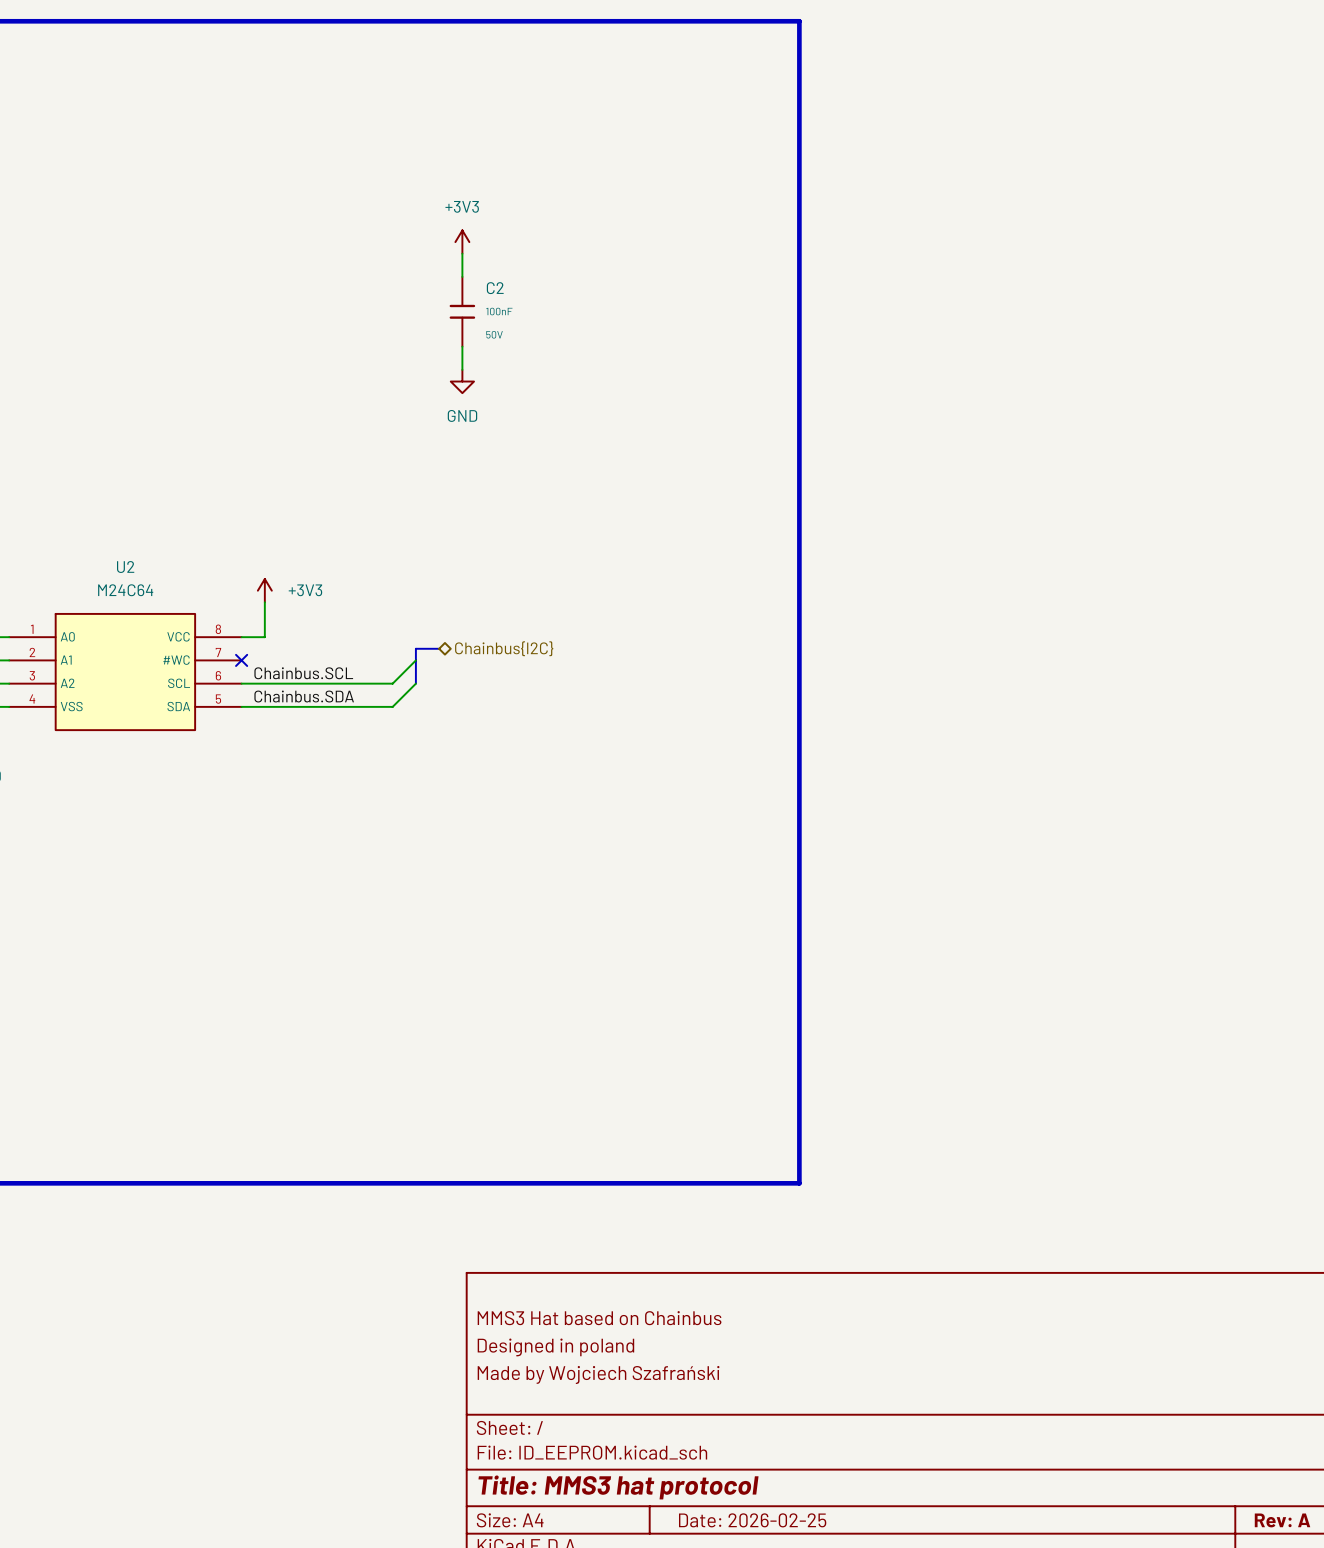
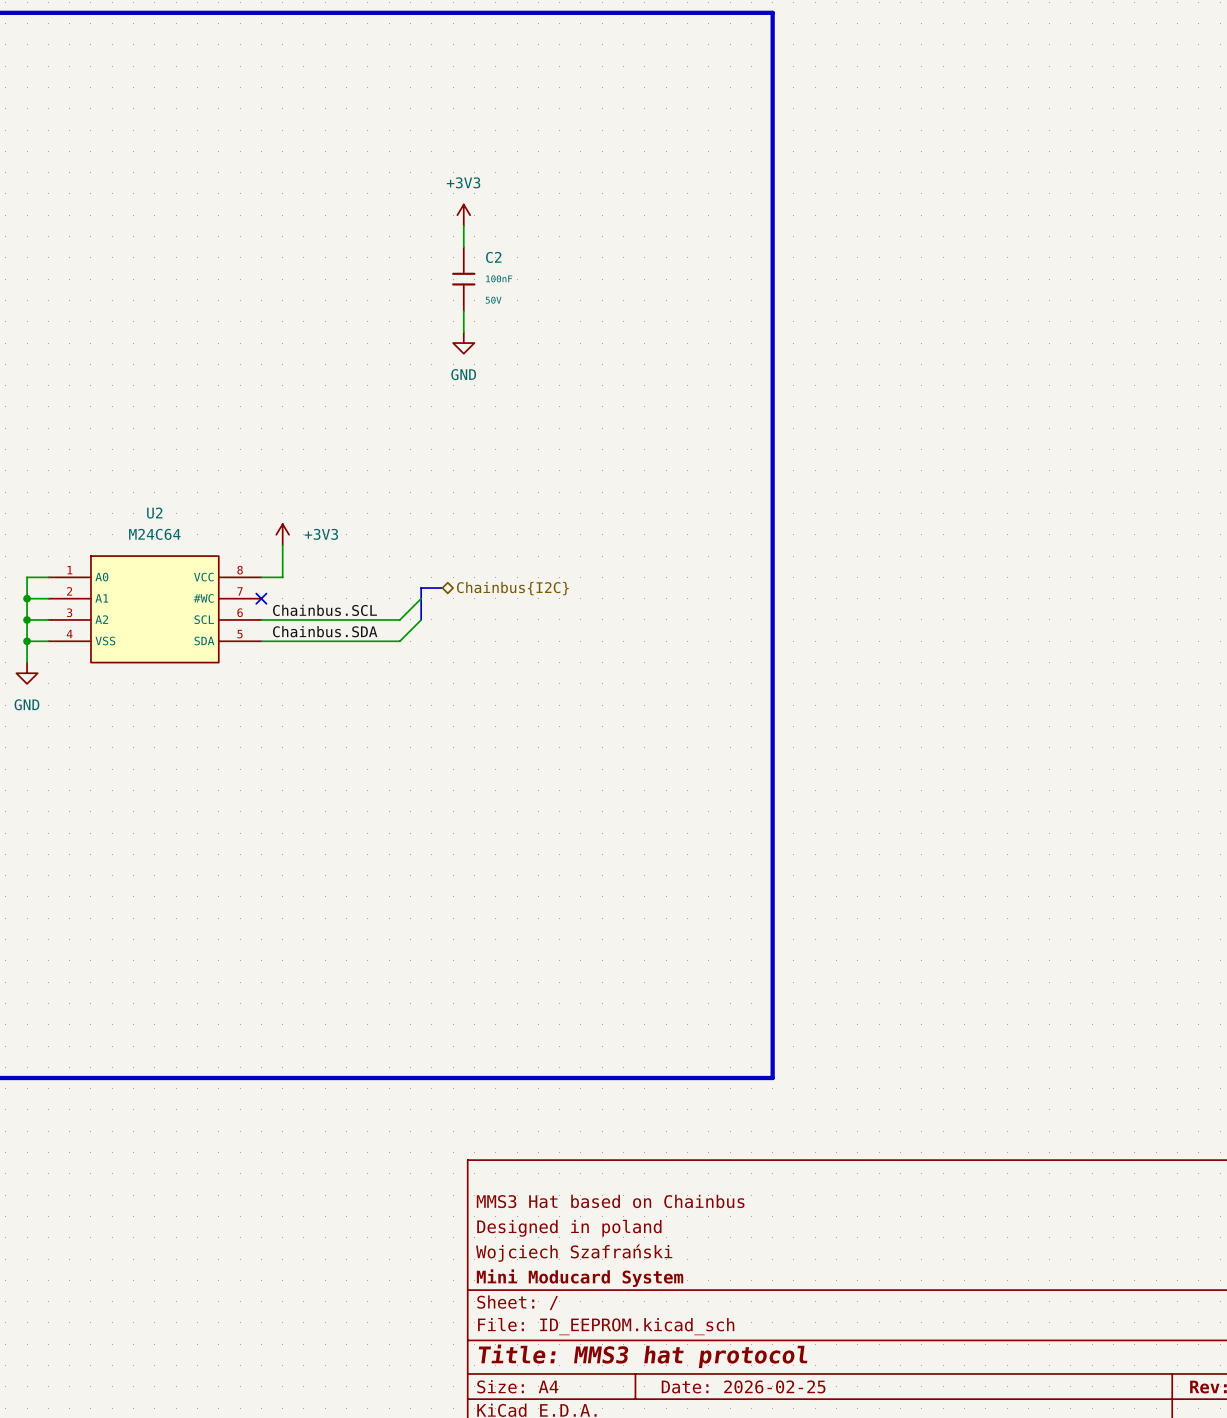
title block: Made by Wojciech Szafrański (598, 1374) -> Wojciech Szafrański (574, 1253)
title block: none -> Mini Moducard System (580, 1278)

